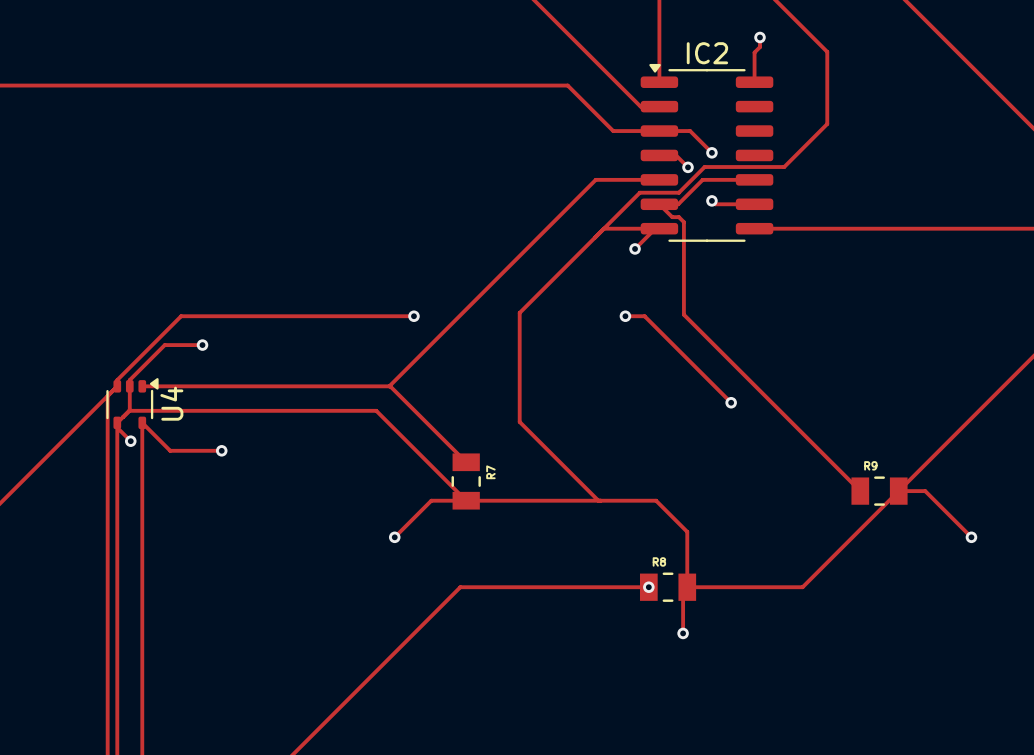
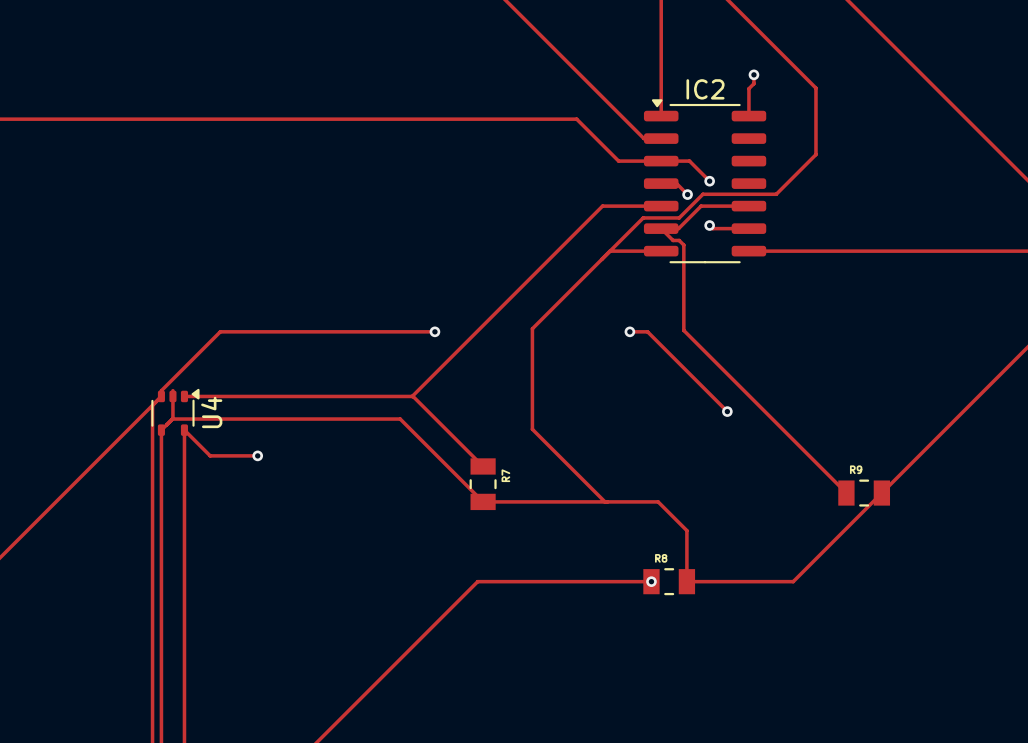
track: (655, 228) (635, 248) -> none
via: (635, 248) -> none
track: (202, 345) (164, 345) (129, 380) -> none
via: (202, 345) -> none
track: (117, 427) (130, 441) -> none
via: (130, 441) -> none
track: (898, 491) (925, 491) (971, 537) -> none
track: (466, 500) (431, 500) (394, 537) -> none
via: (394, 537) -> none
via: (971, 537) -> none
track: (687, 587) (683, 591) (683, 633) -> none
via: (683, 633) -> none

